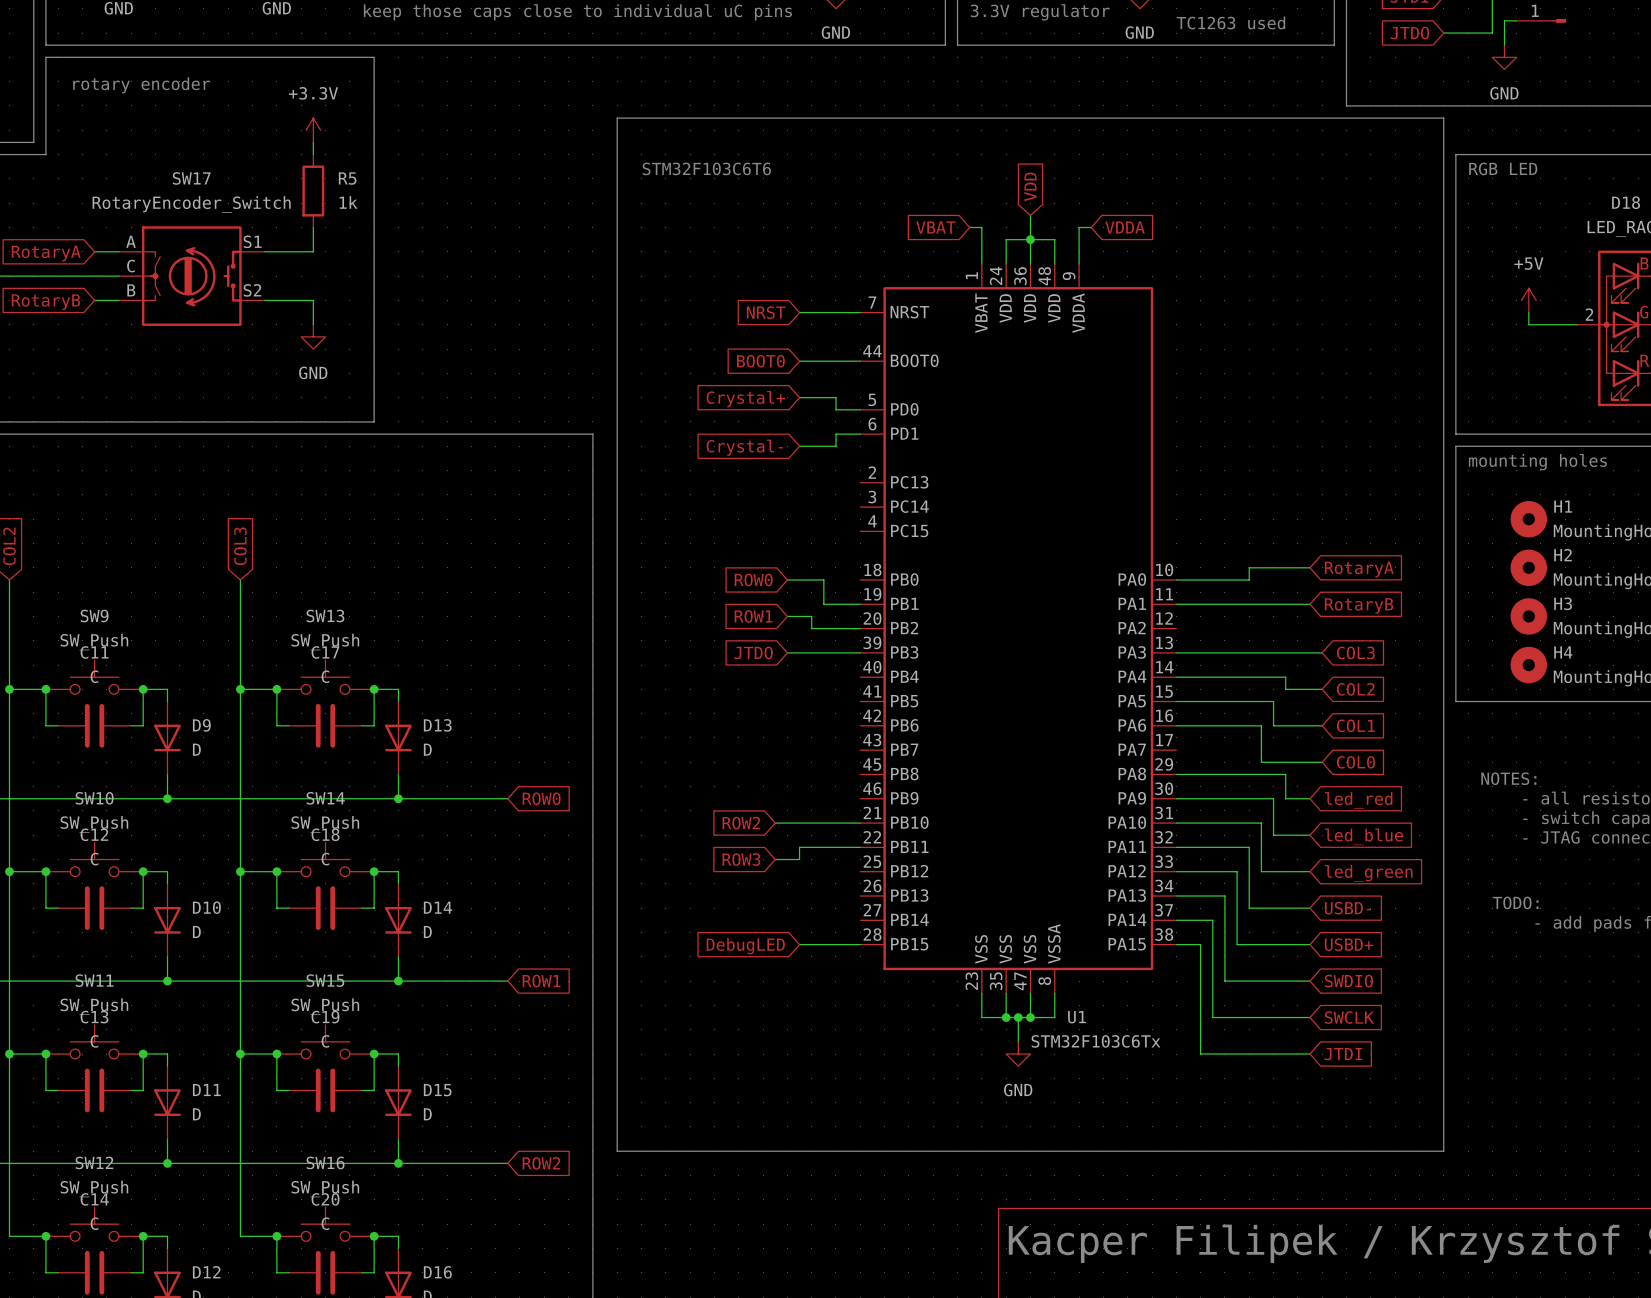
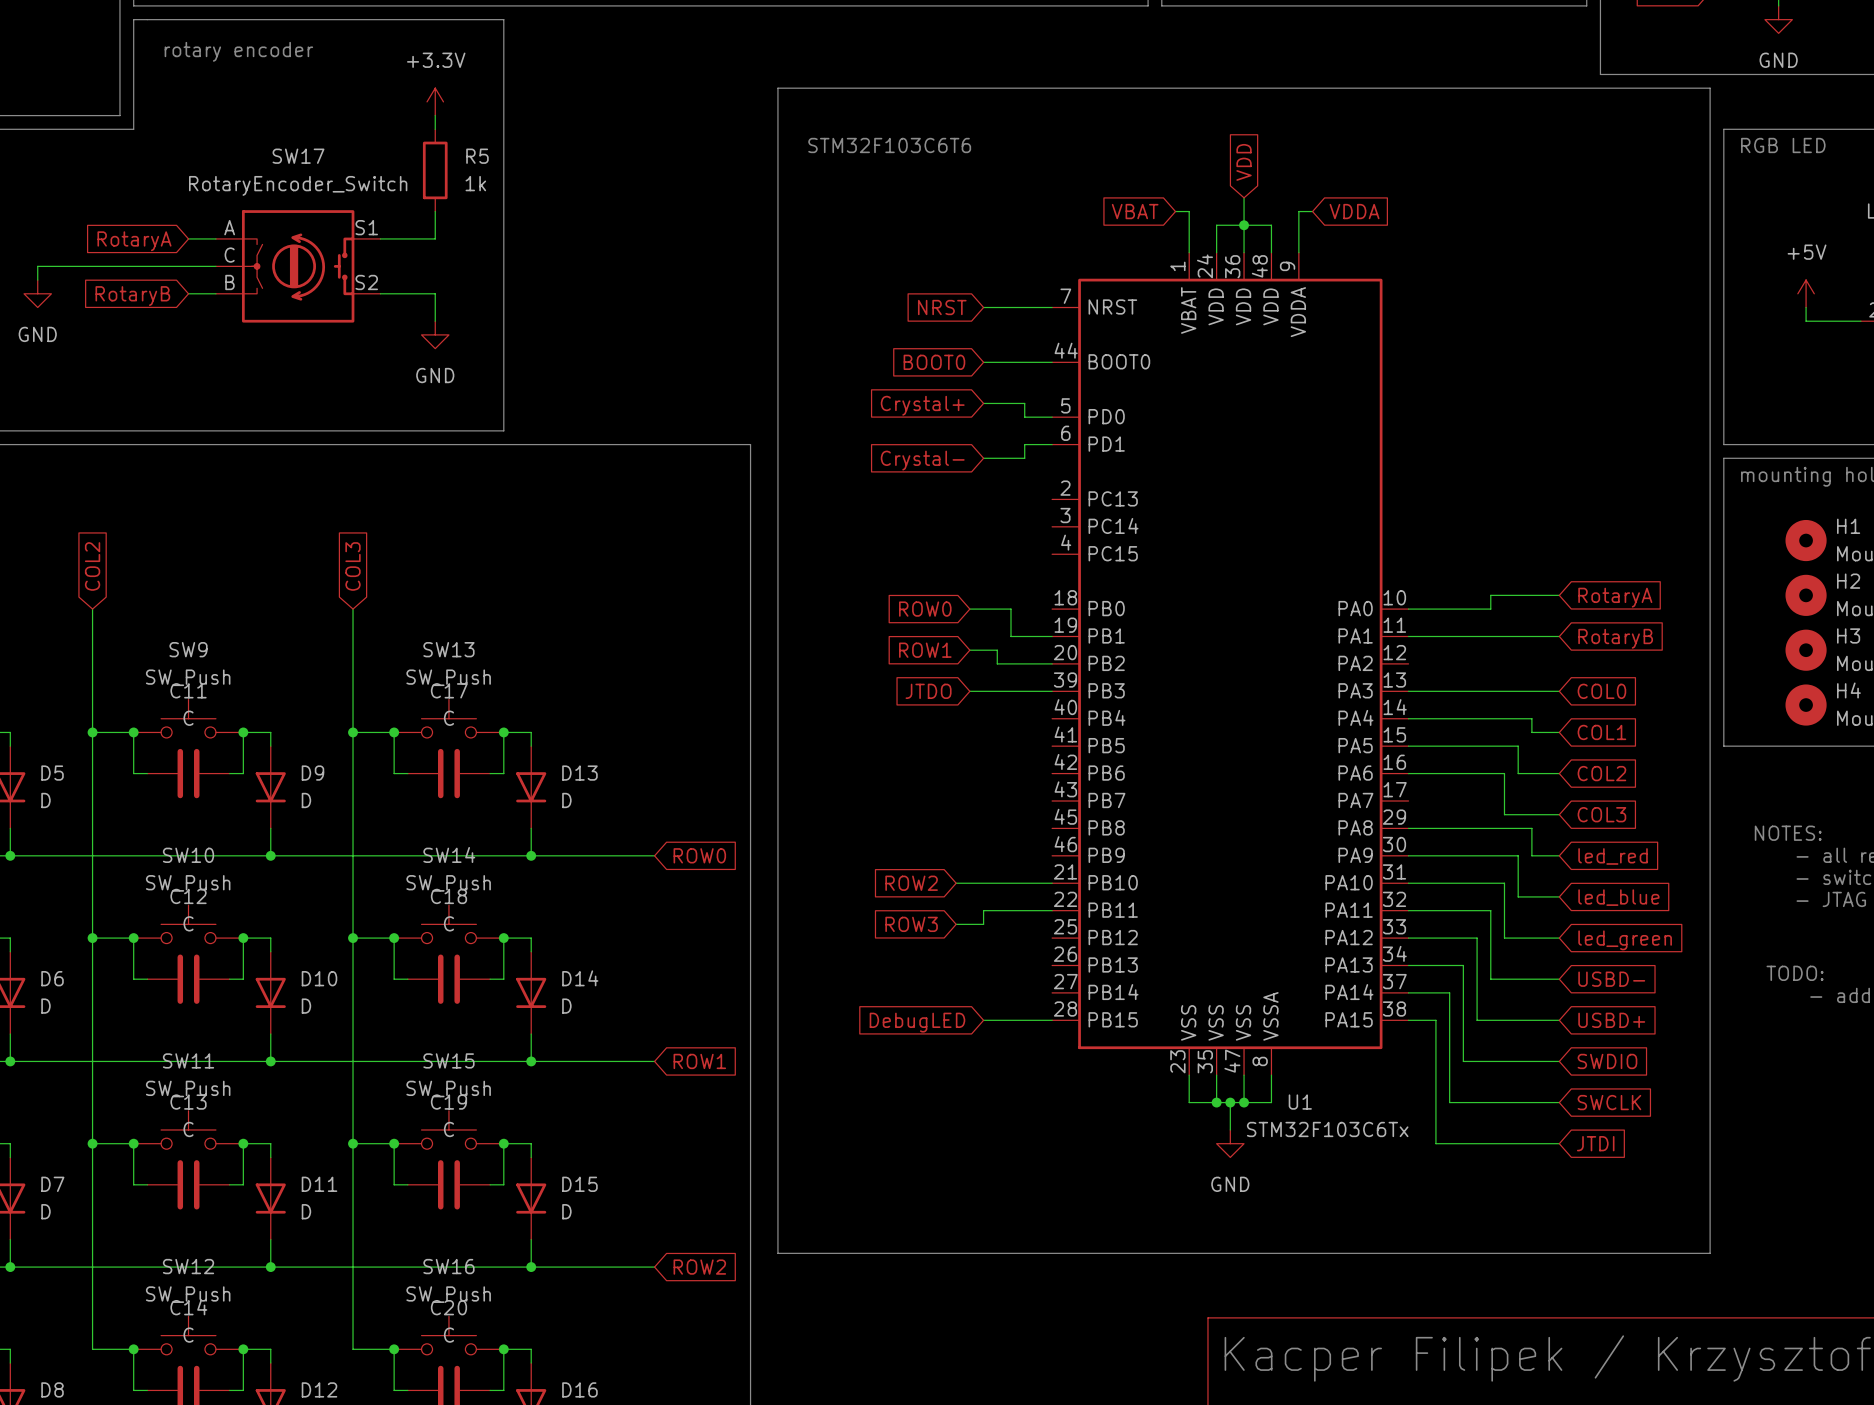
wire: (1310, 652) (1322, 652) -> none
global label position: COL3 (1355, 652) -> COL3 (1601, 814)
wire: (1310, 689) (1322, 689) -> none
global label position: COL2 (1355, 689) -> COL2 (1601, 773)
wire: (1310, 725) (1322, 725) -> none
global label position: COL1 (1355, 725) -> COL1 (1601, 732)
wire: (1310, 762) (1322, 762) -> none
global label position: COL0 (1355, 762) -> COL0 (1601, 691)

